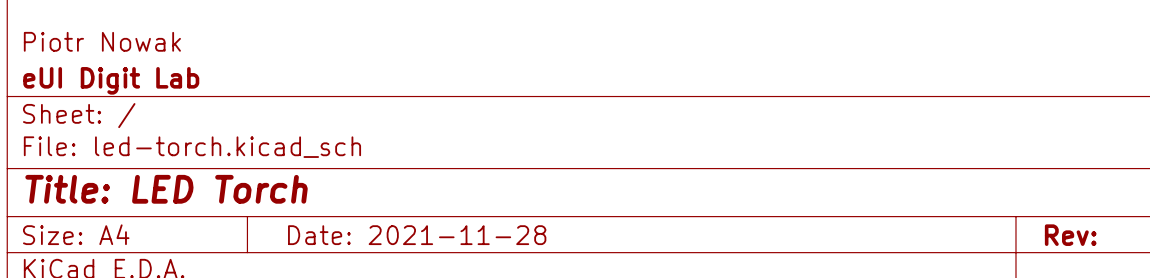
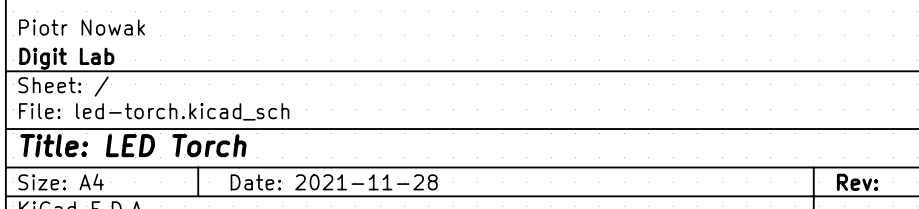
title block: eUI Digit Lab (111, 80) -> Digit Lab (66, 58)

